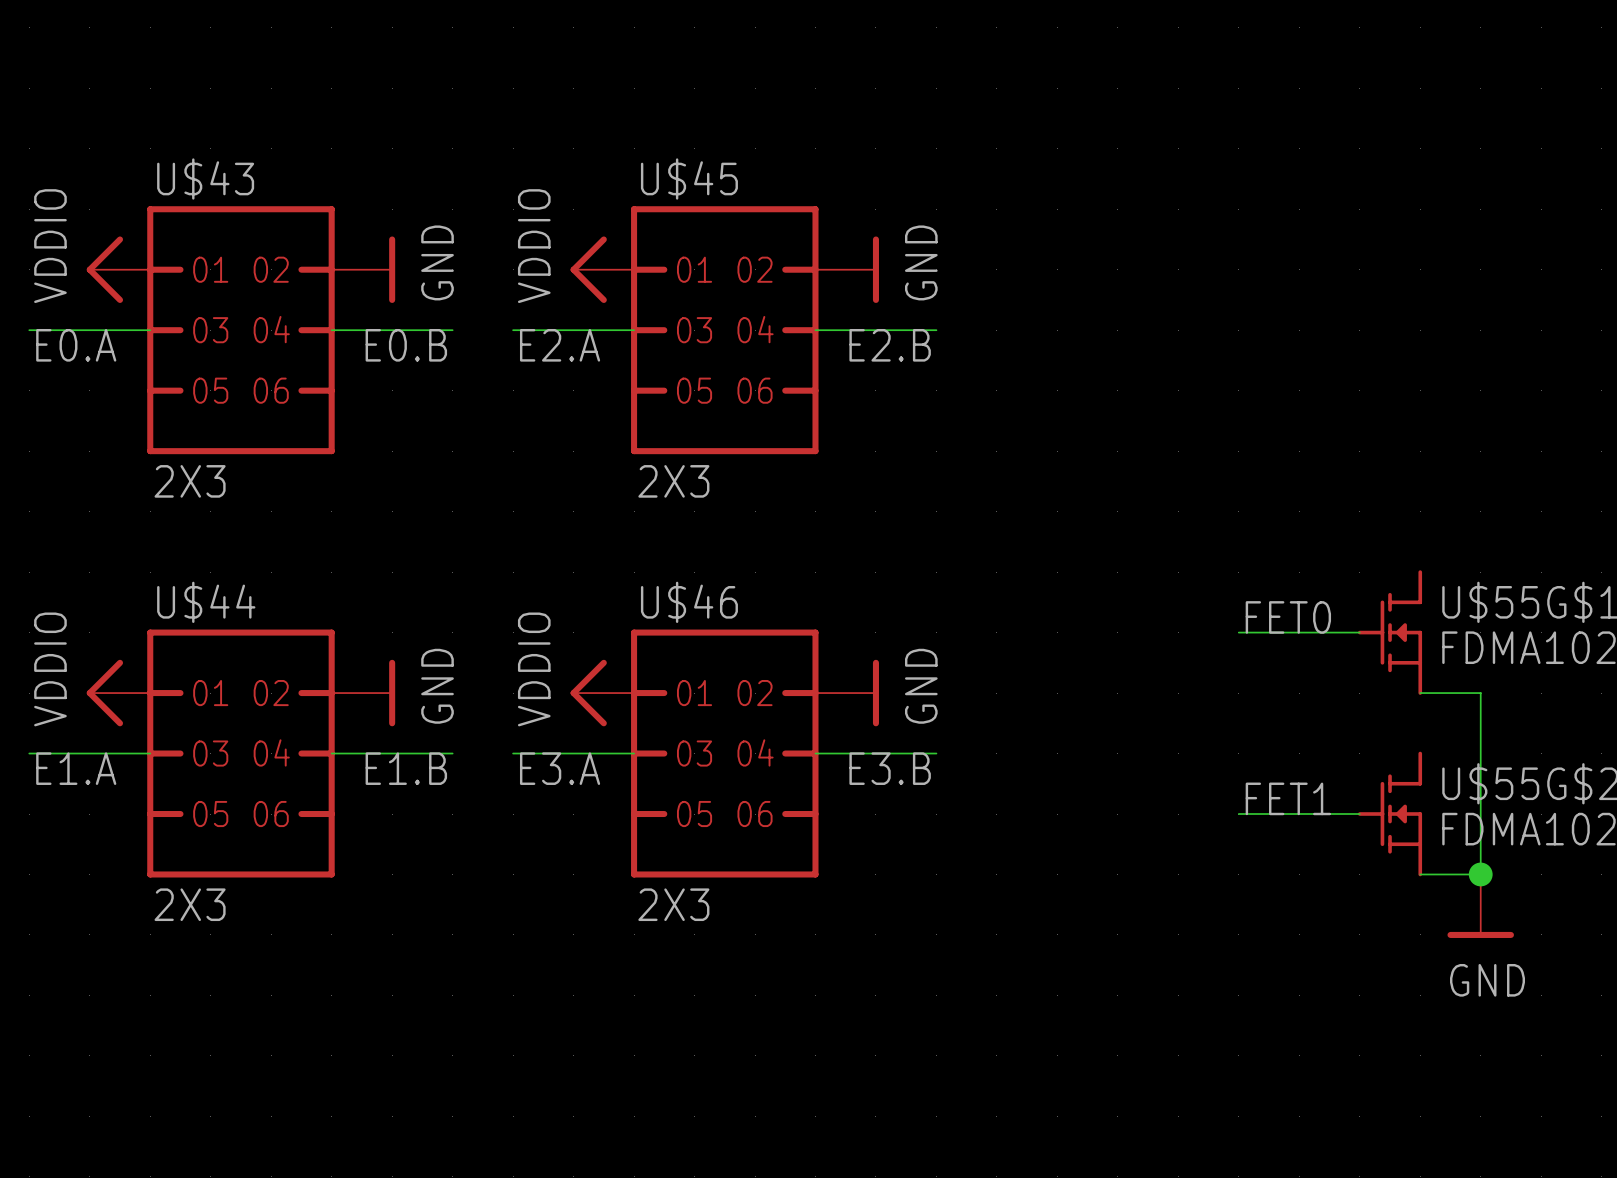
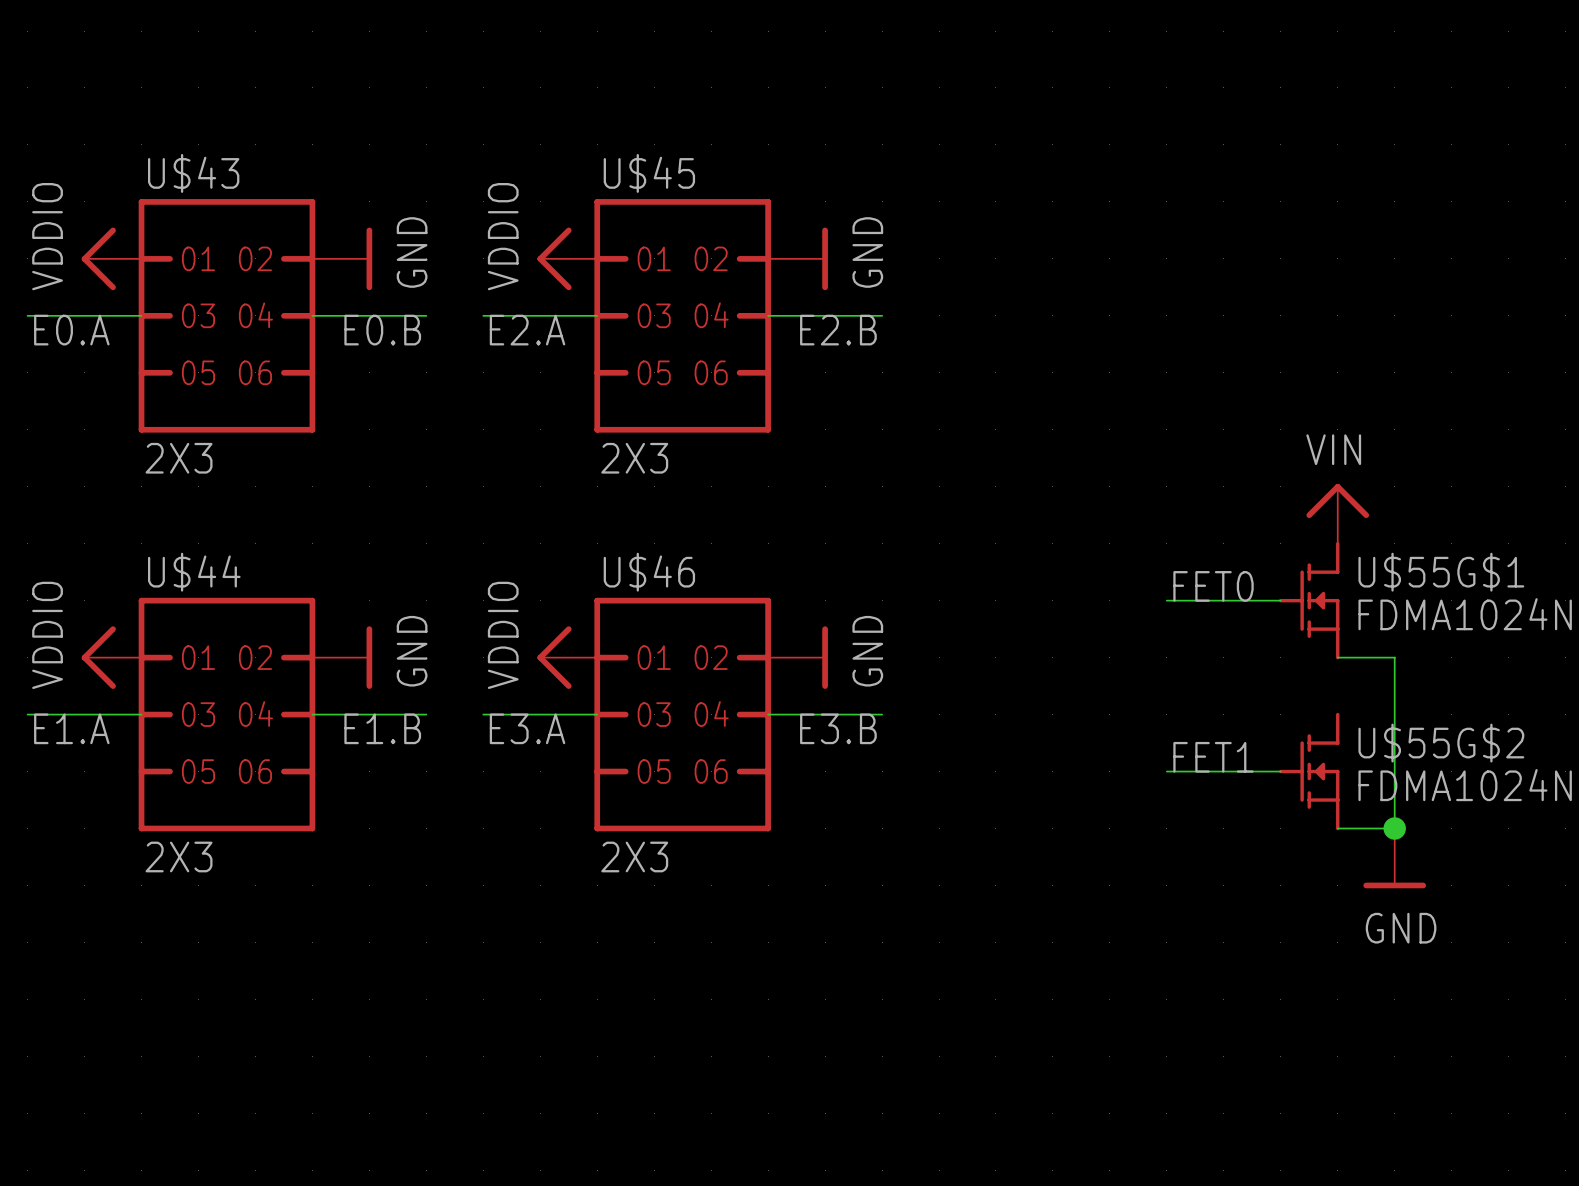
power symbol: none -> VIN (1337, 513)

